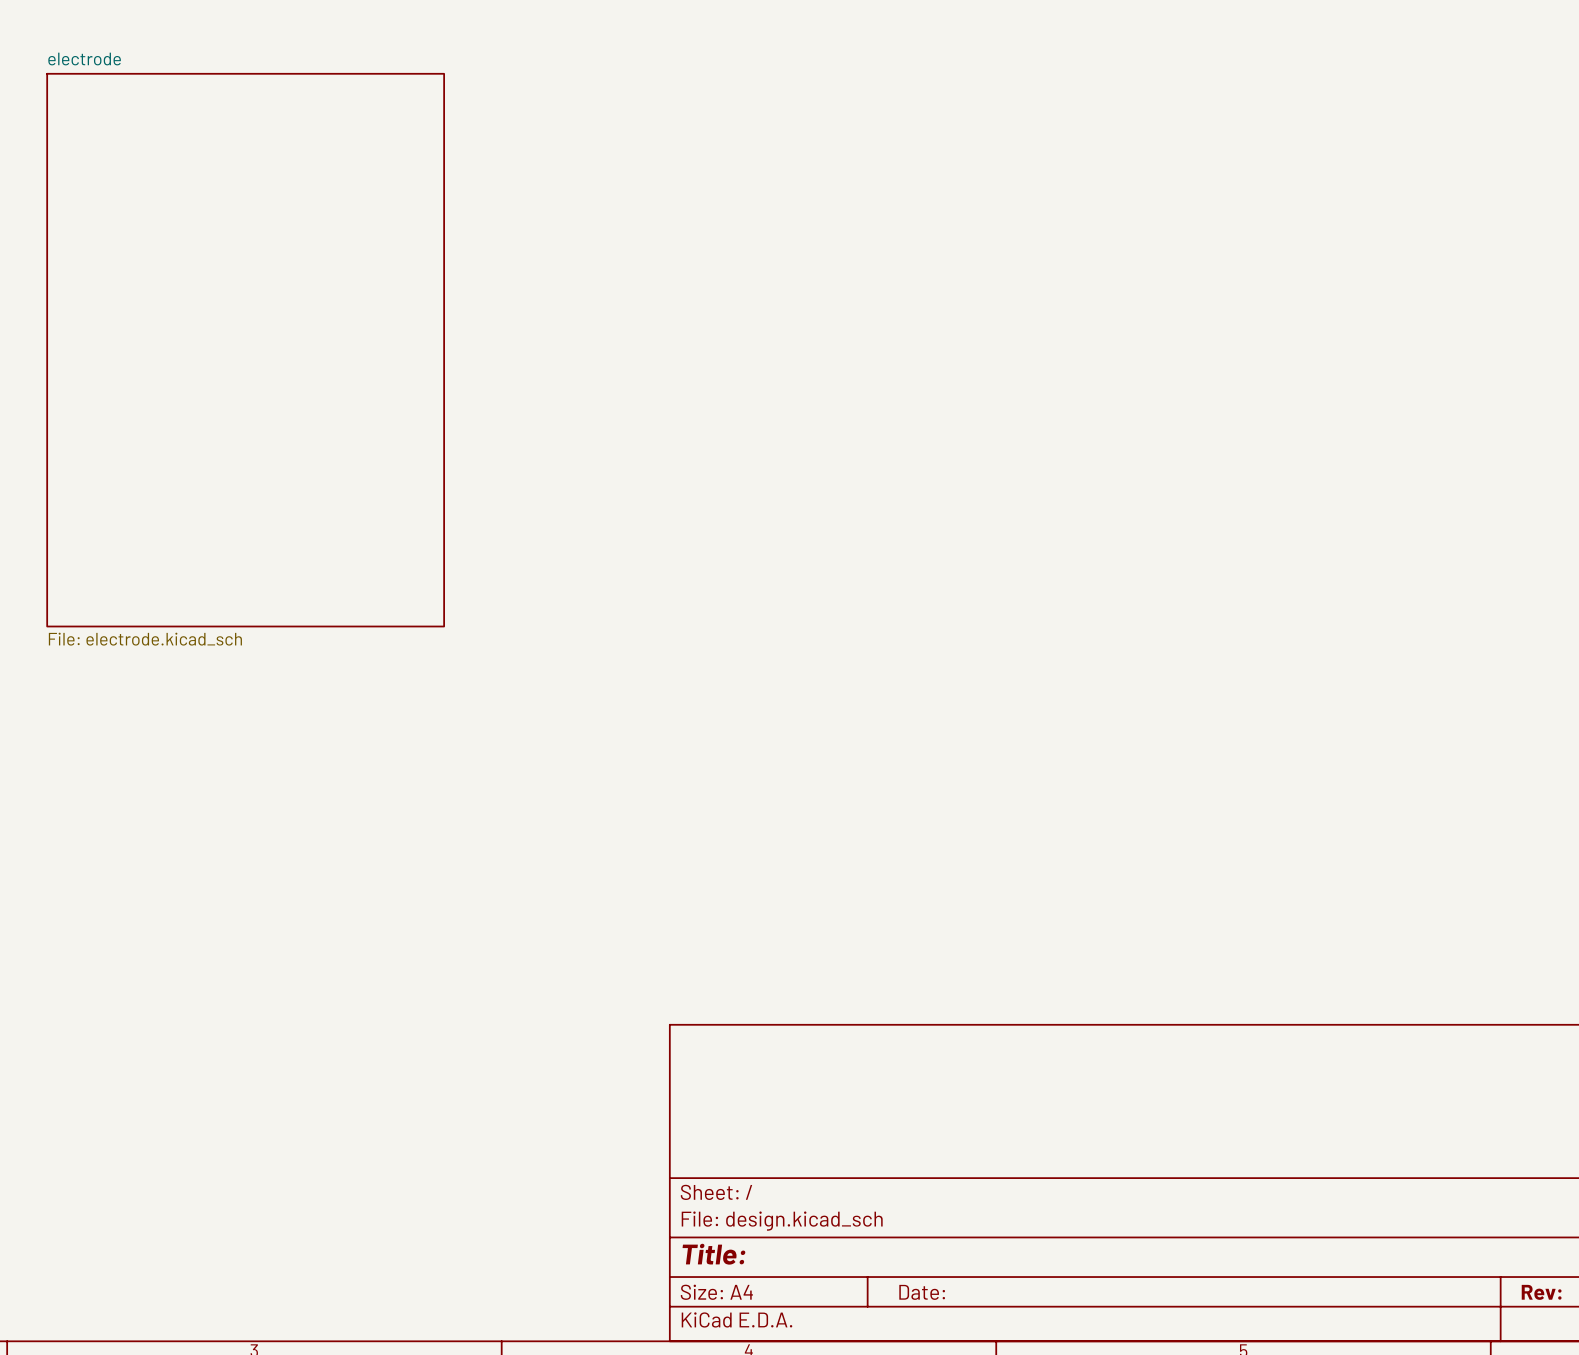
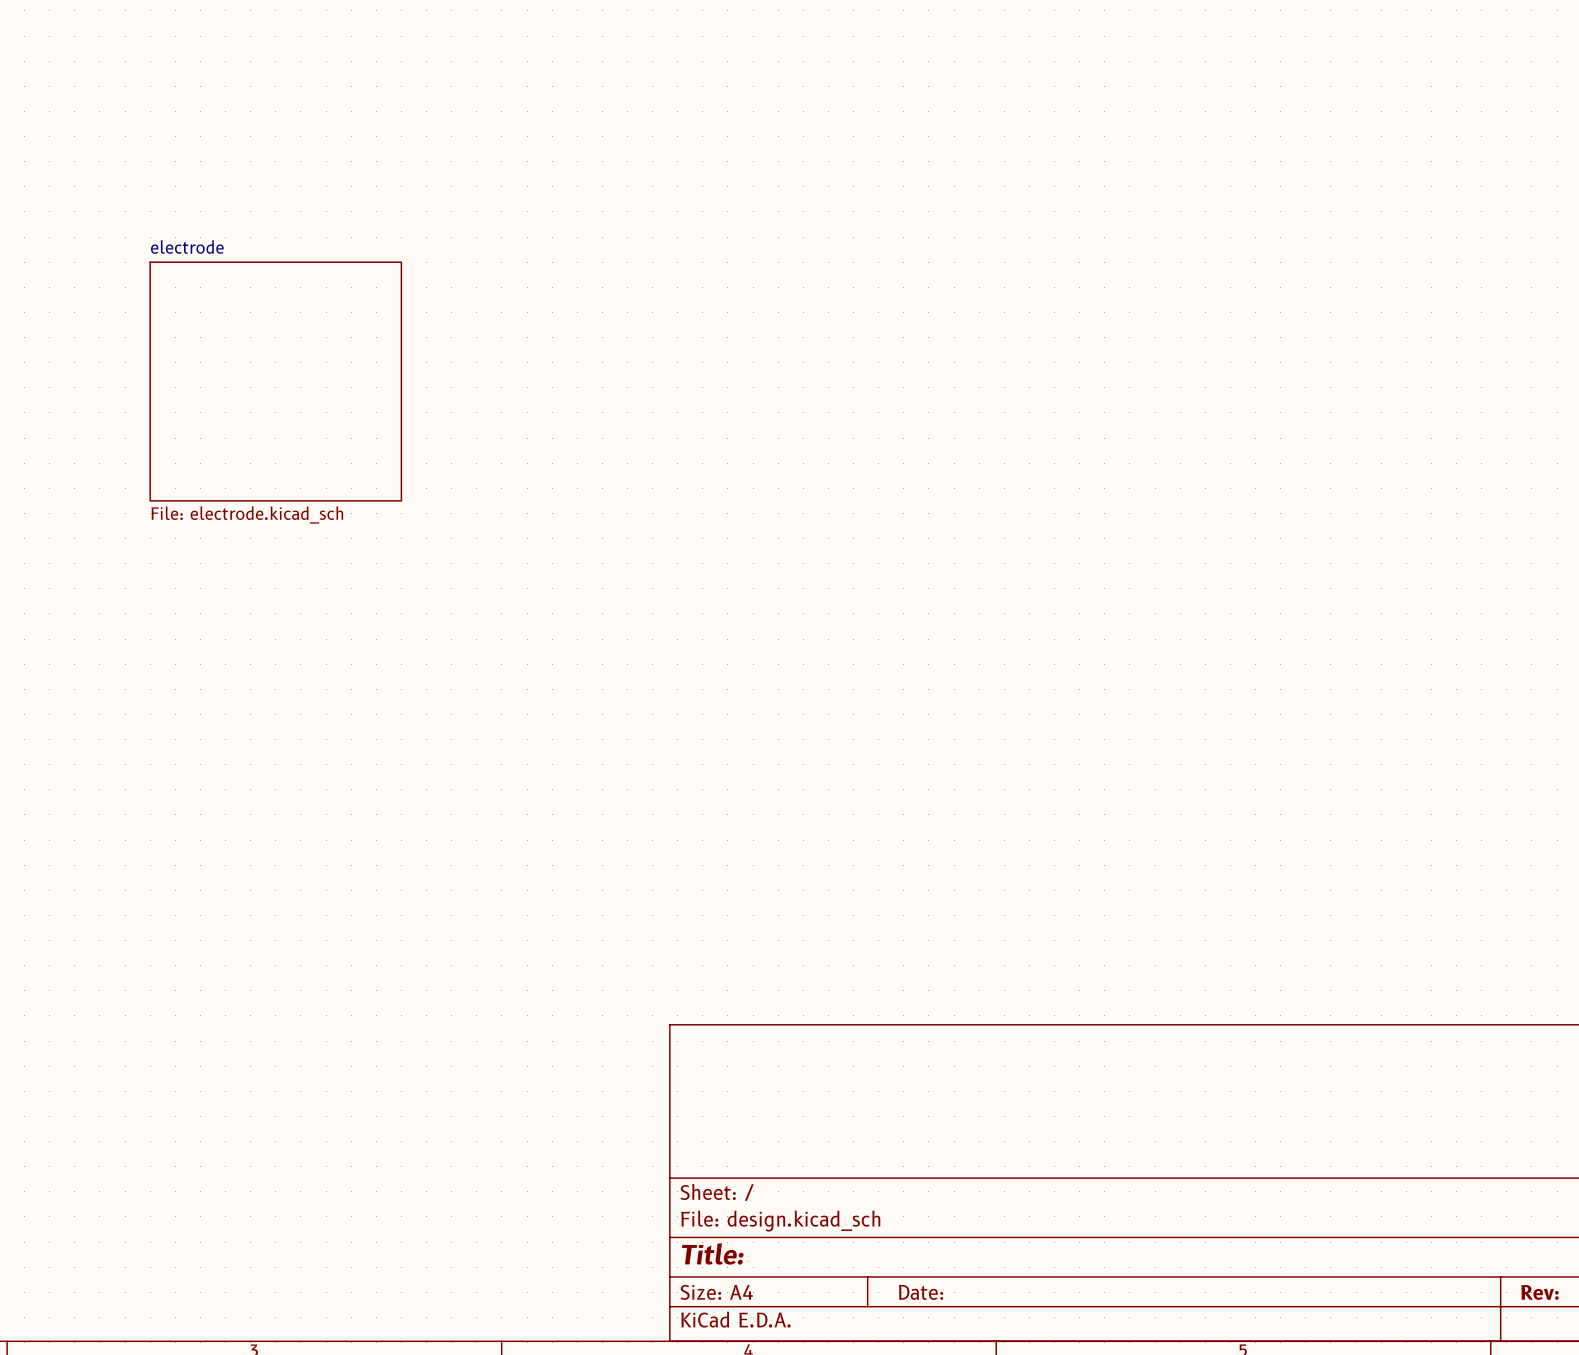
sheet electrode: File: electrode.kicad_sch (245, 350) -> none
sheet electrode: none -> File: electrode.kicad_sch (275, 381)

